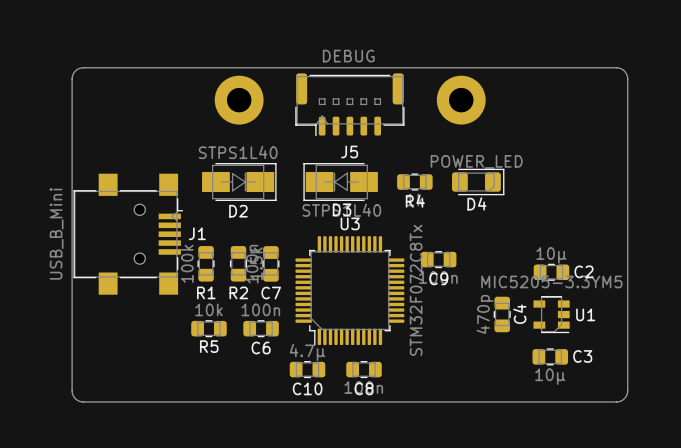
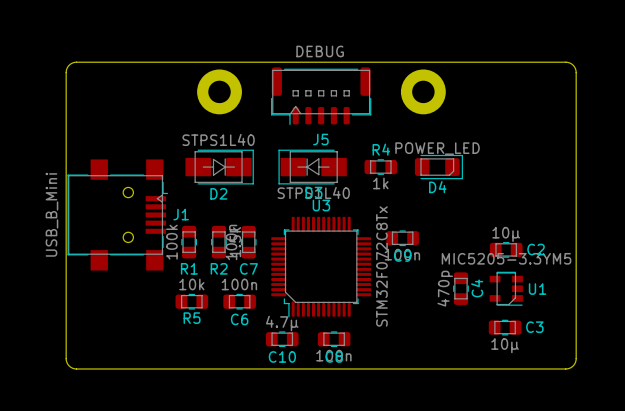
R4 name position: R4 (415, 201) -> R4 (381, 149)

